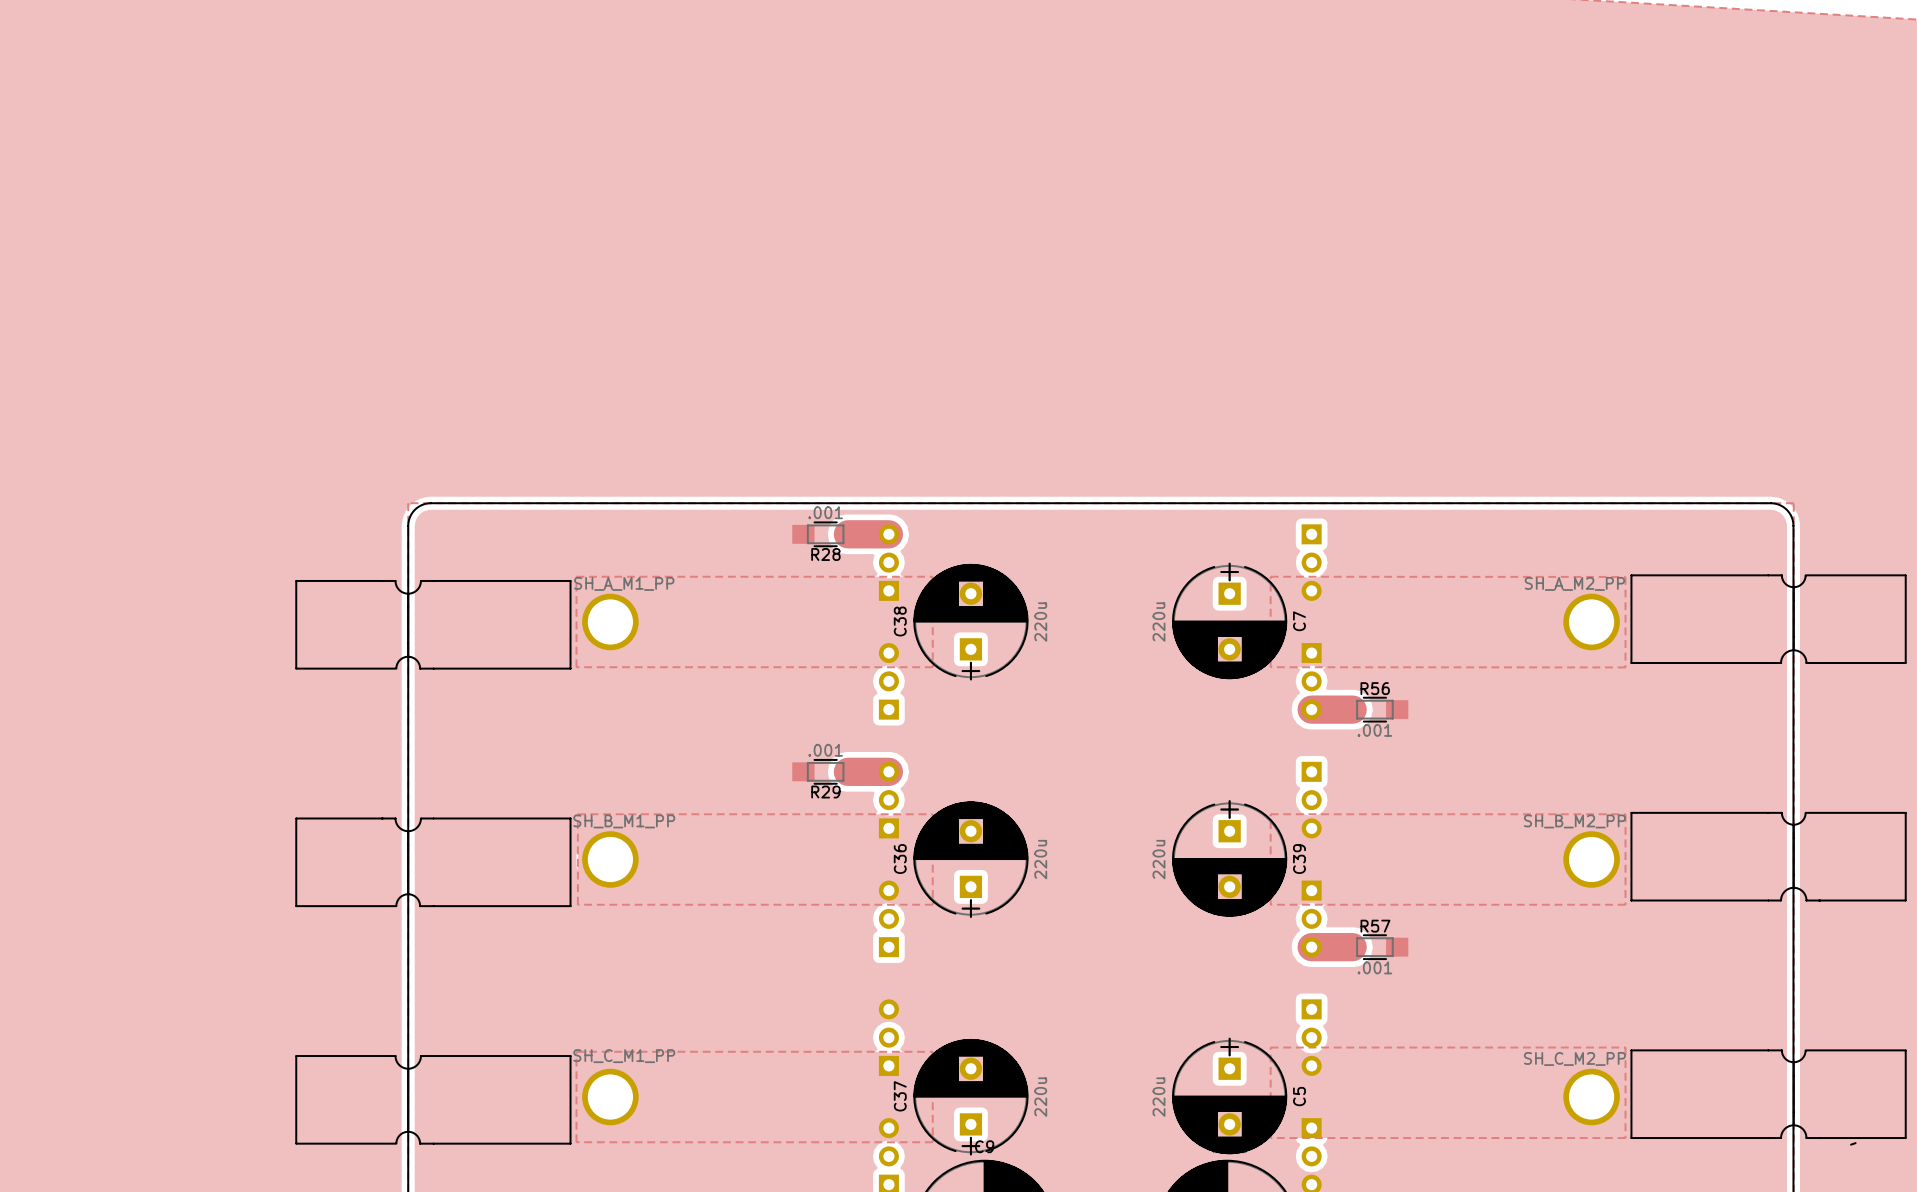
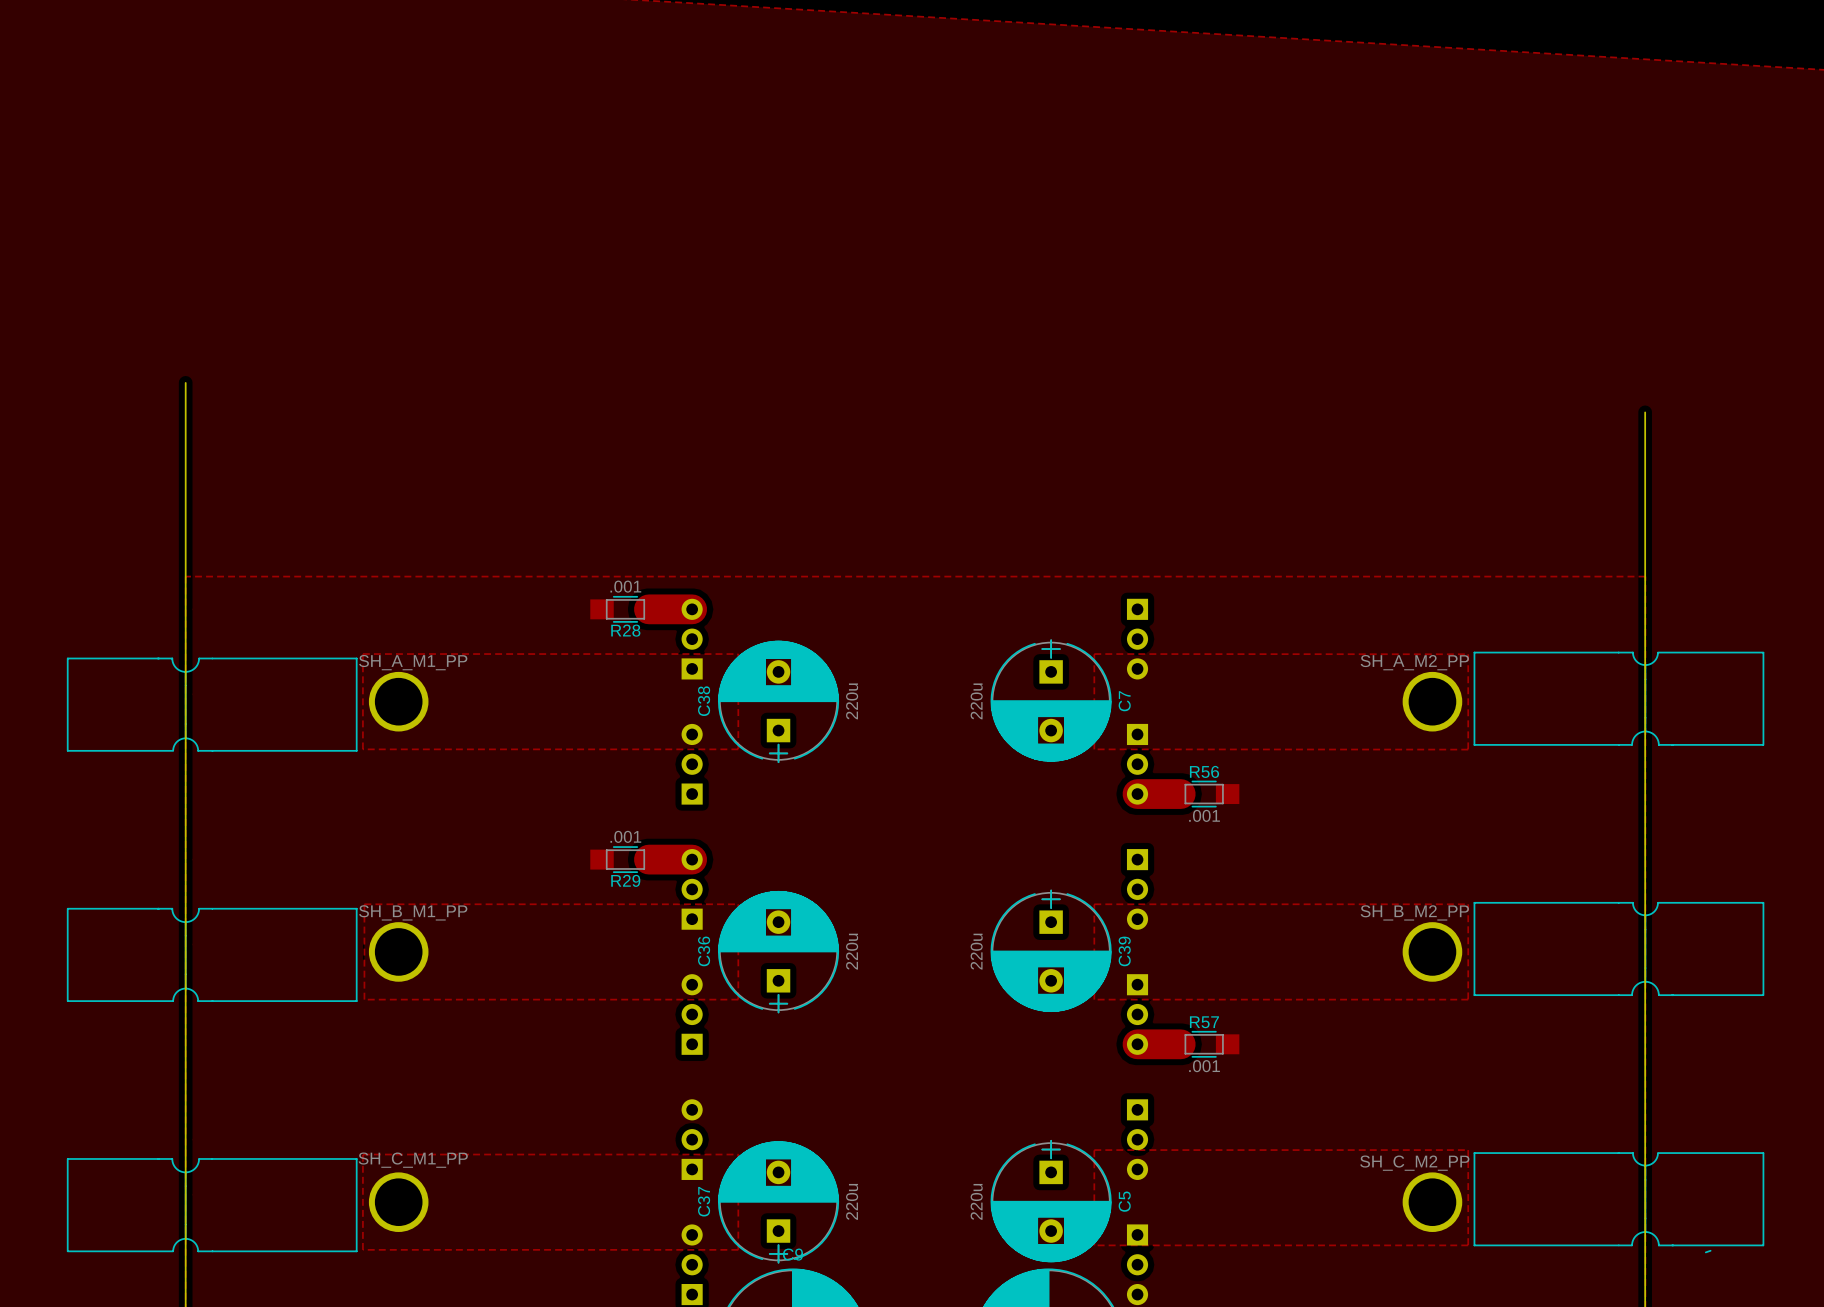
board edge: none -> (185, 382) (185, 600)
board edge: (408, 525) (409, 517) (414, 509) (422, 504) (430, 503) (1770, 503) (1779, 504) (1786, 509) (1791, 517) (1793, 525) -> (1645, 412) (1645, 600)

